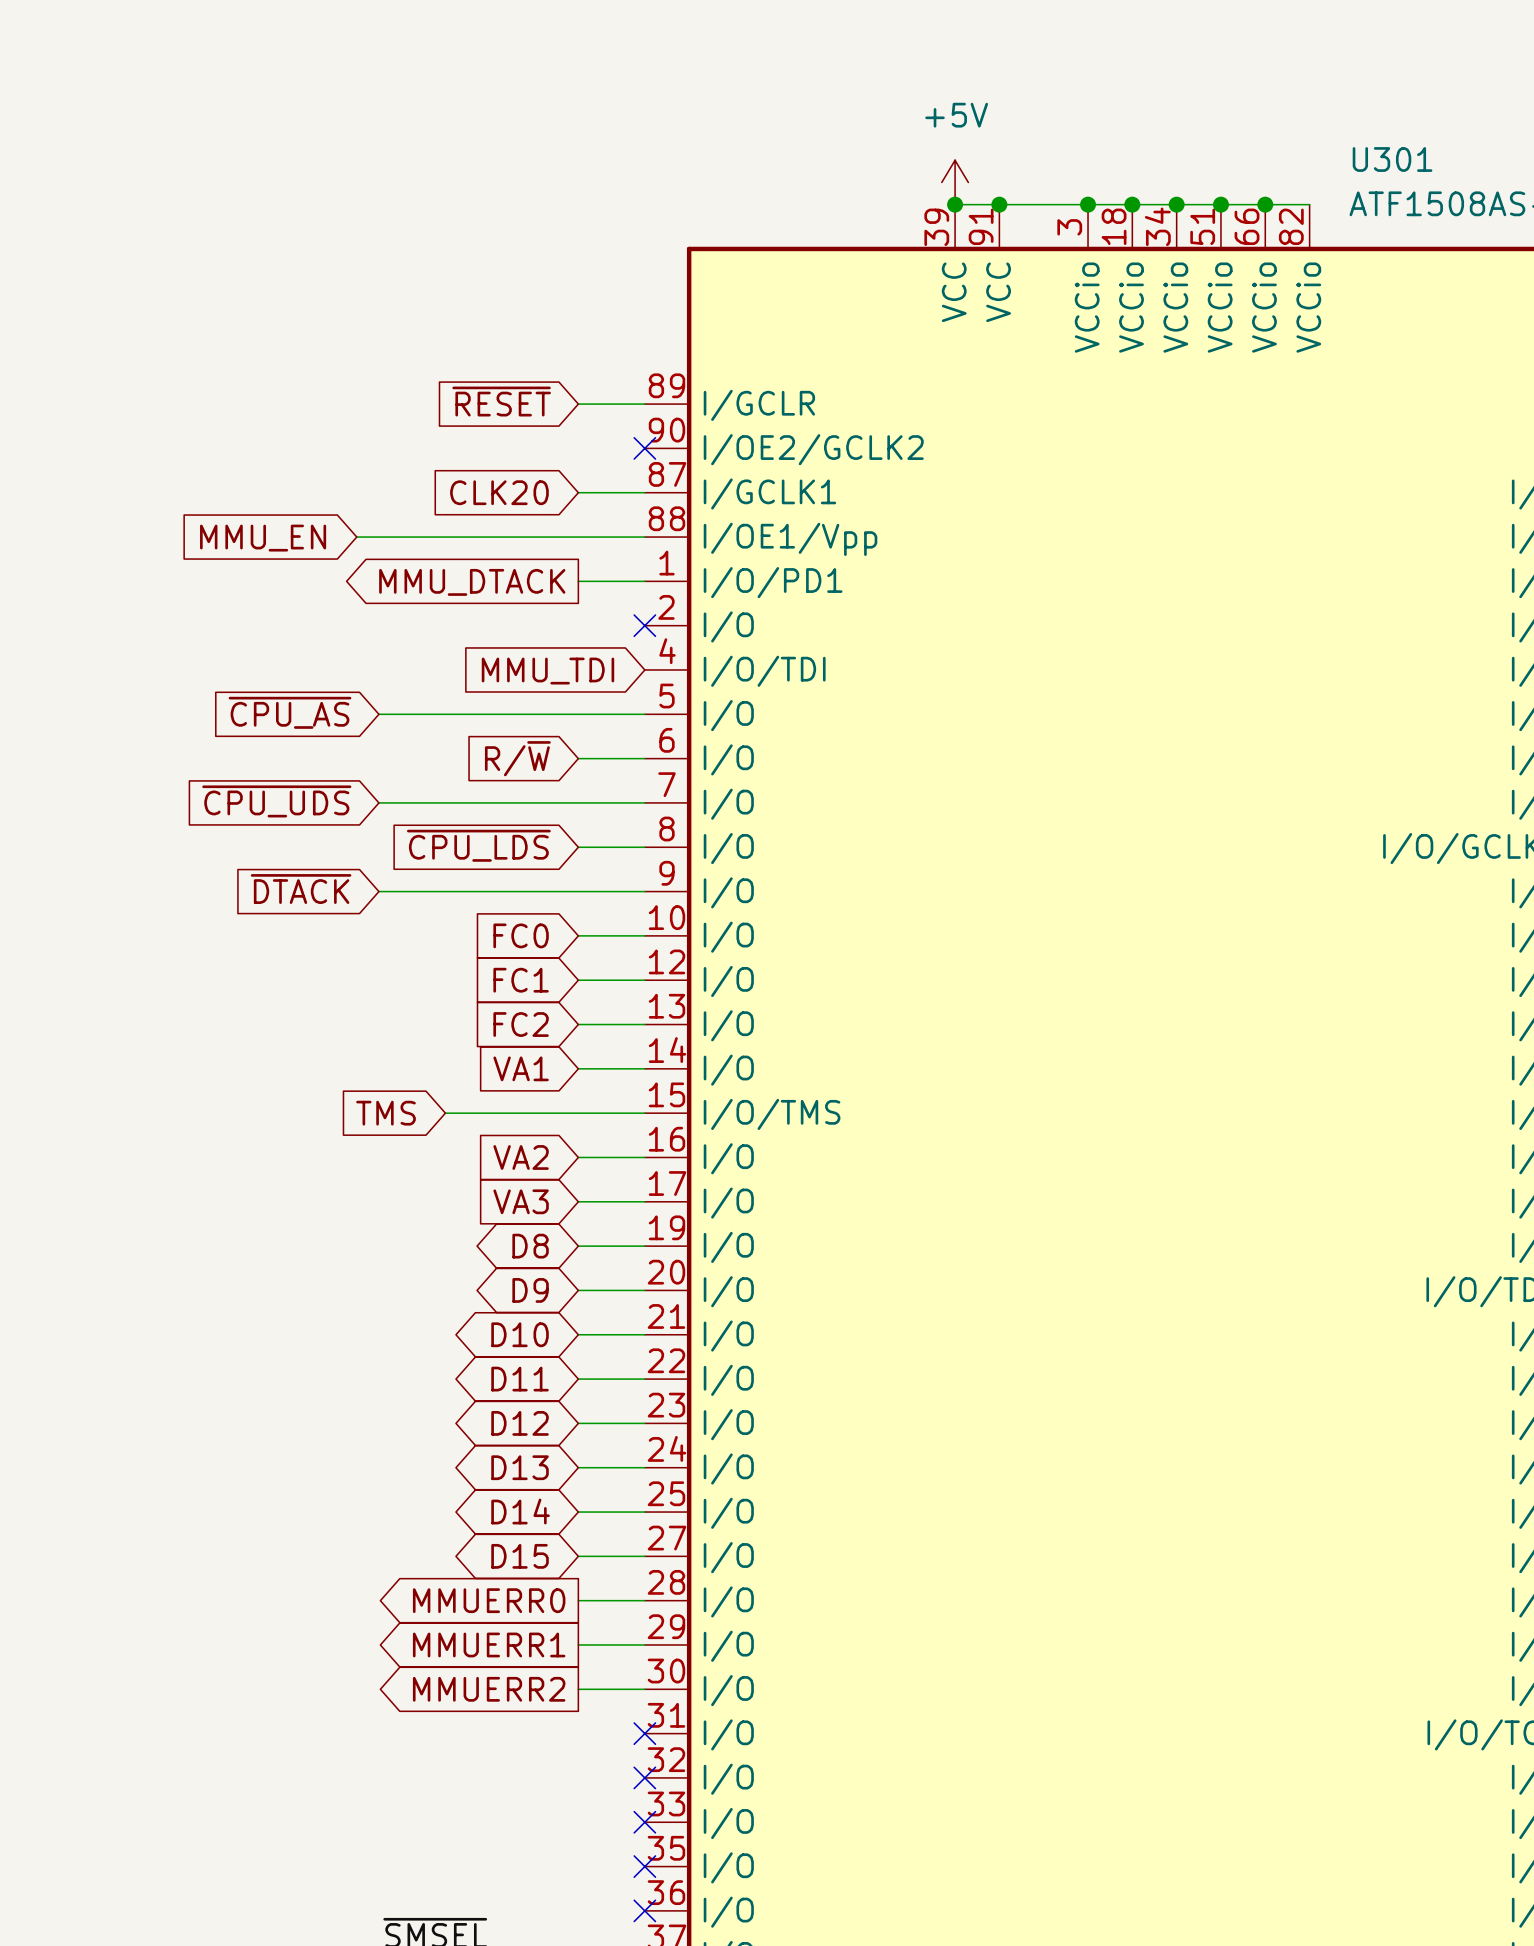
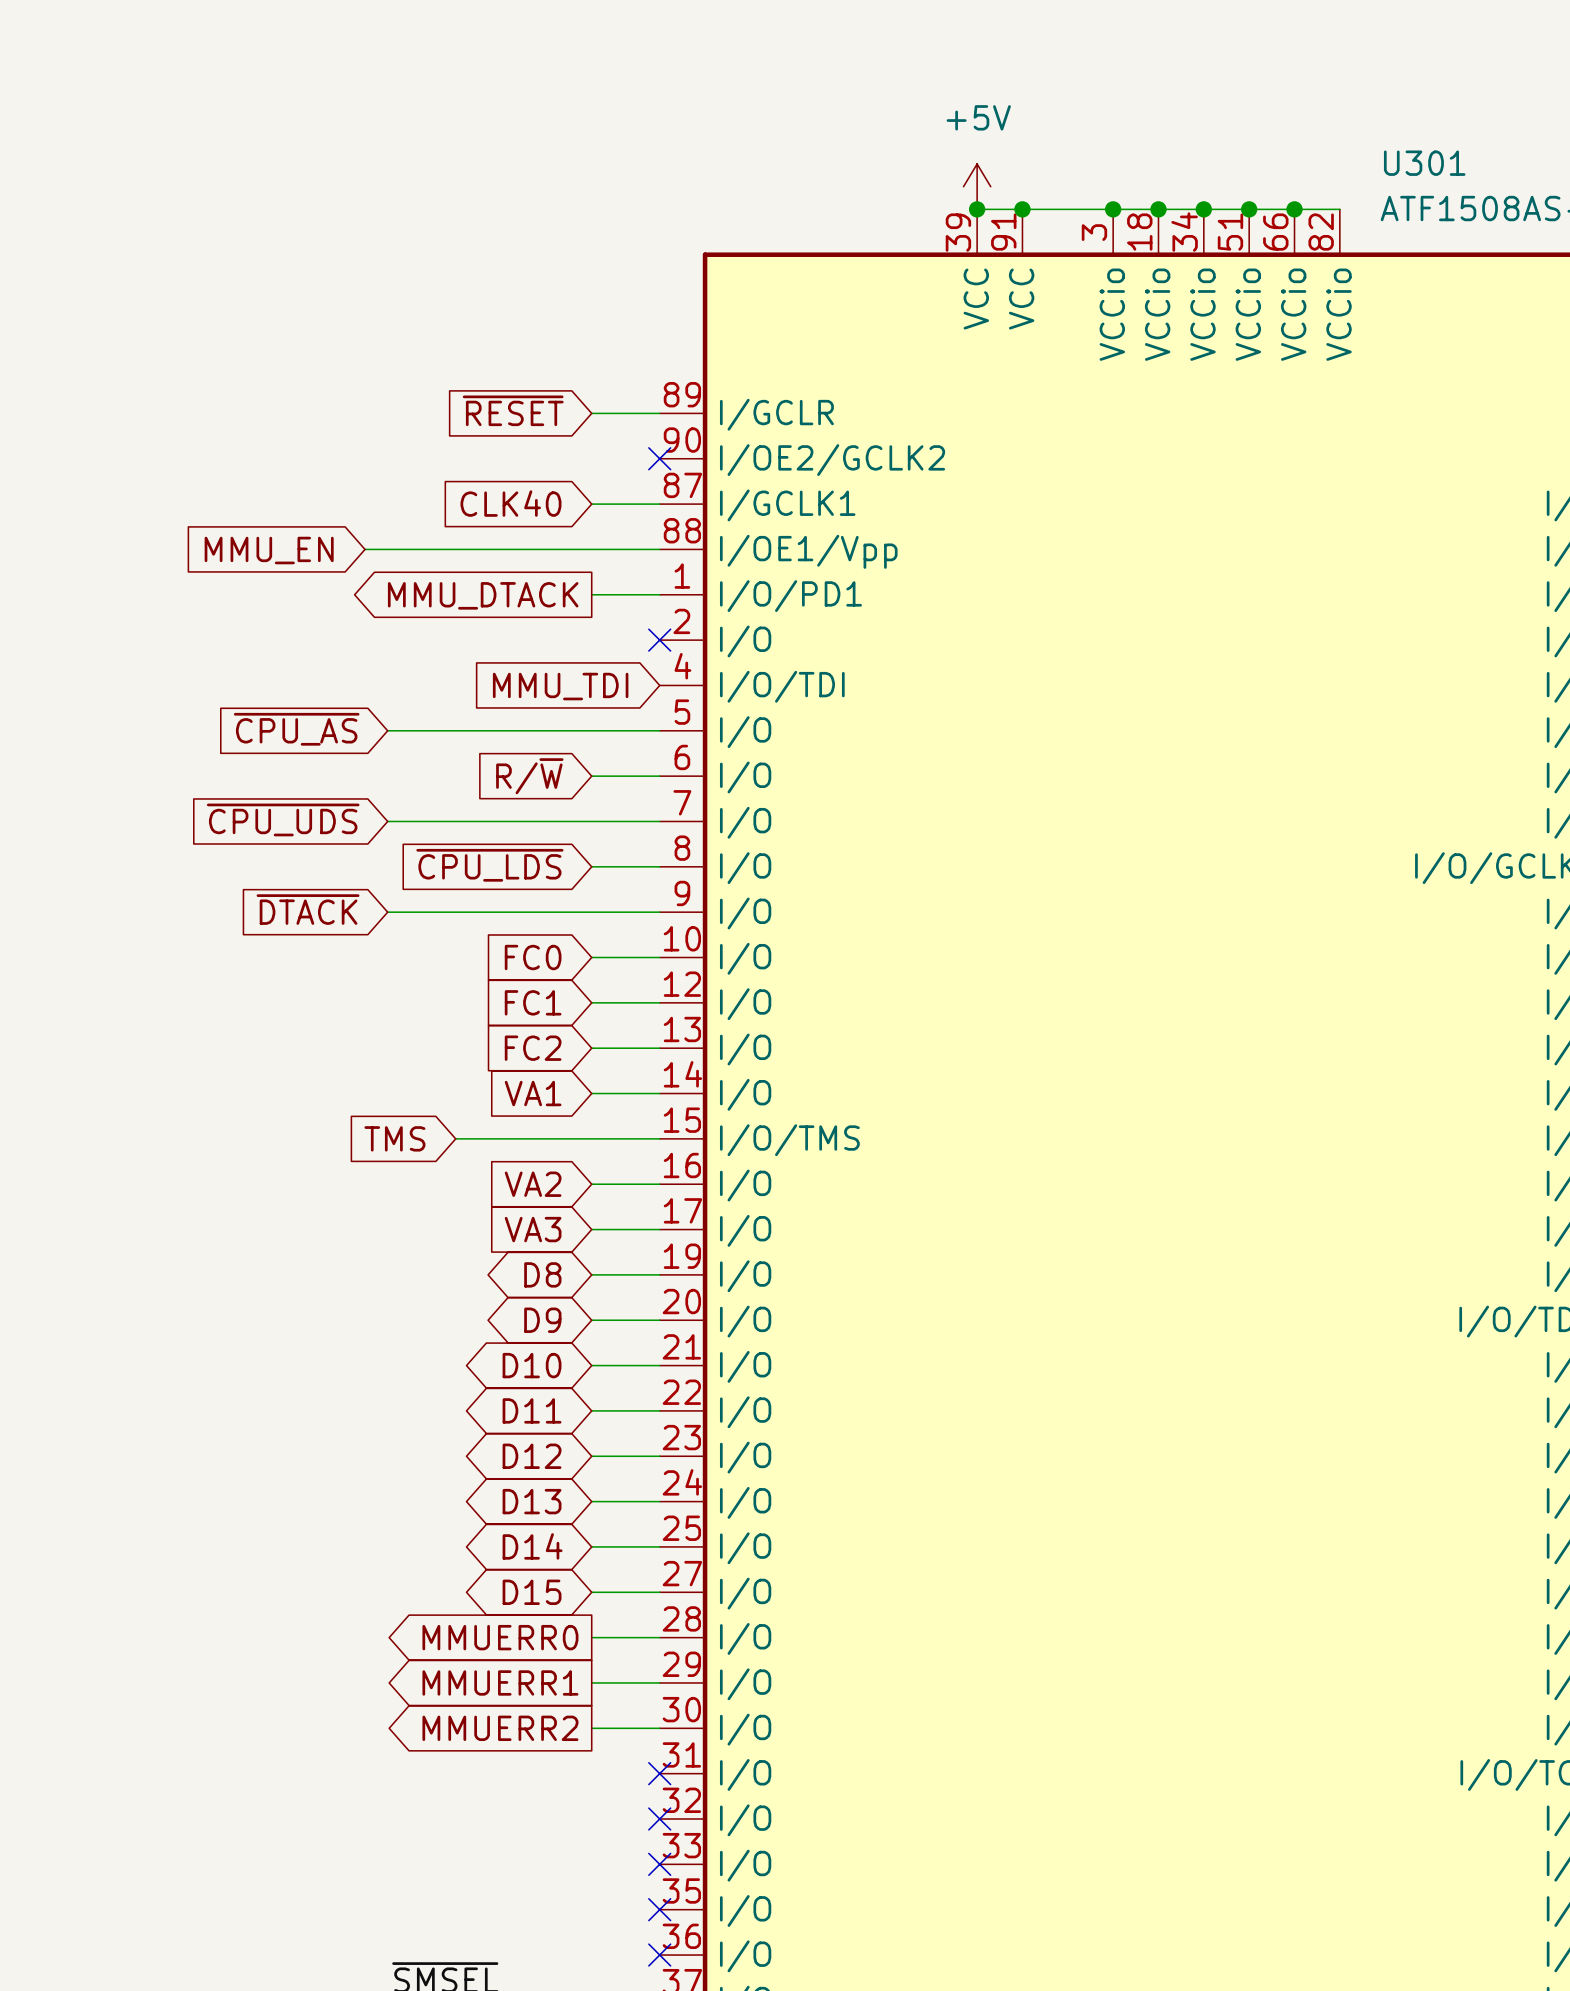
global label: CLK20 (499, 492) -> CLK40 (510, 503)

